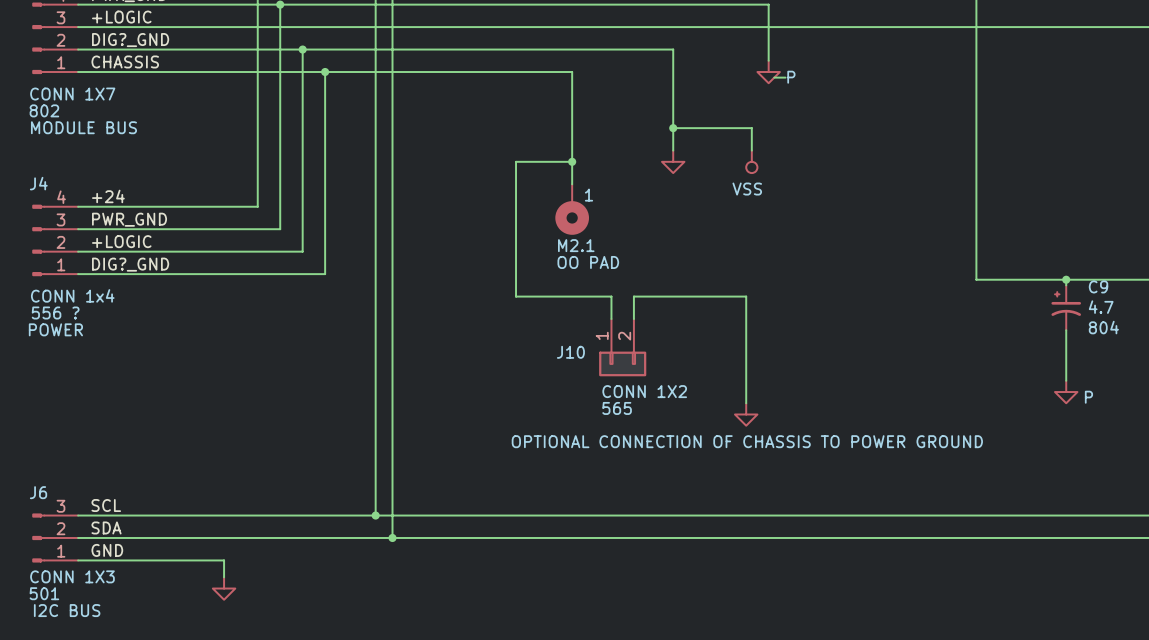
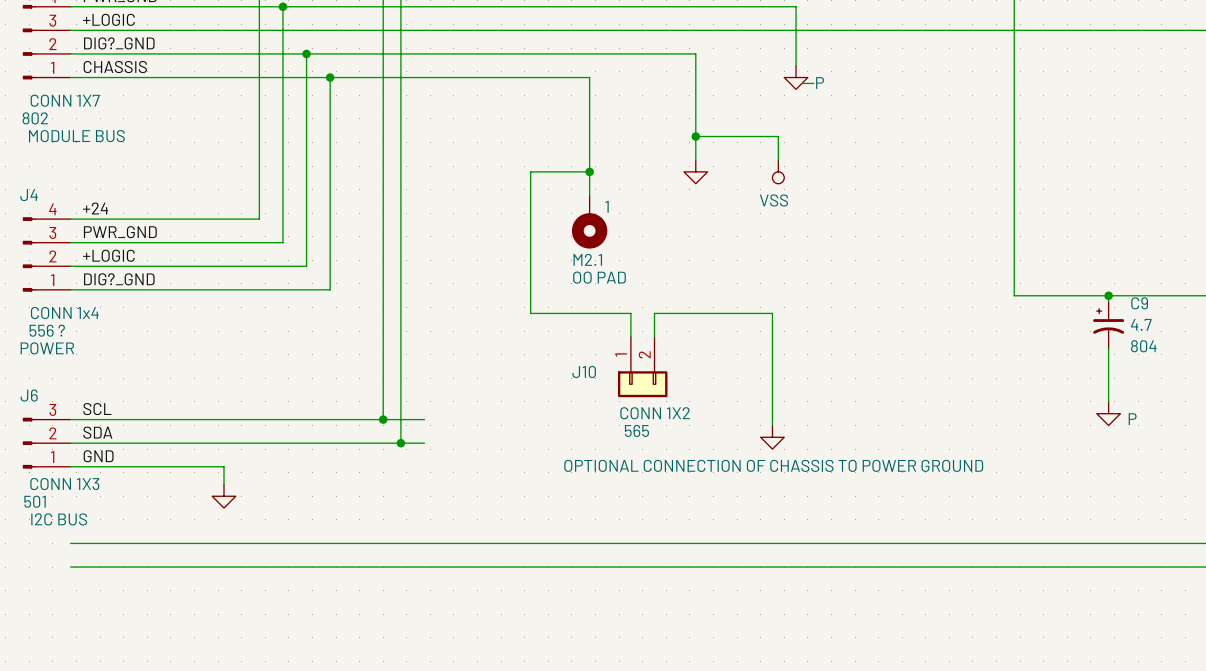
wire: none -> (70, 419) (424, 419)
wire: (375, 397) (375, 515) -> none
junction: none -> (383, 419)
wire: none -> (70, 443) (424, 443)
wire: (392, 420) (392, 537) -> none
junction: none -> (400, 443)
label position: SCL (106, 505) -> SCL (97, 409)
junction: (375, 515) -> none
label position: SDA (106, 527) -> SDA (97, 432)
J6 position: (55, 537) -> (46, 443)
junction: (392, 537) -> none
label position: GND (107, 550) -> GND (98, 456)
wire: (78, 560) (224, 560) (224, 577) -> (70, 466) (223, 466) (223, 484)
power symbol position: (224, 588) -> (223, 496)

